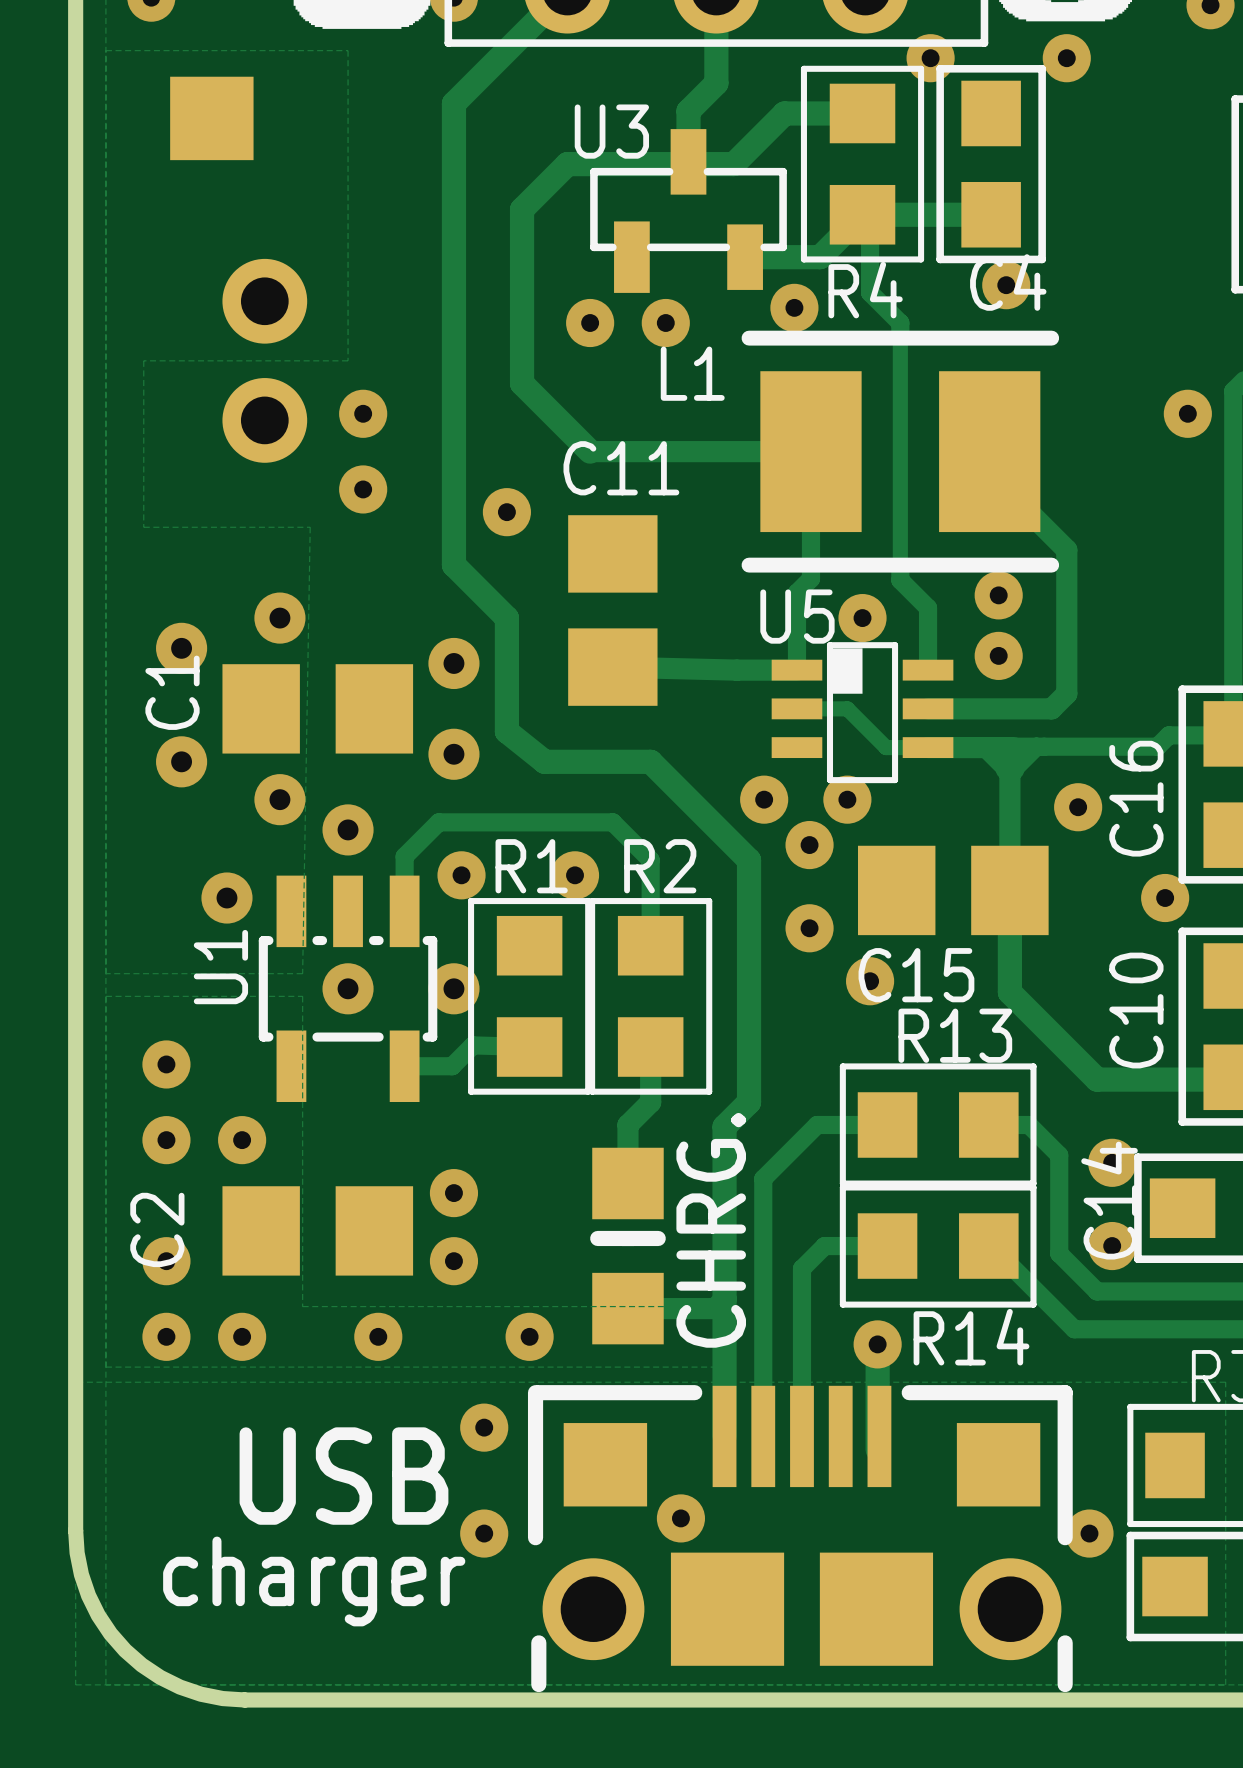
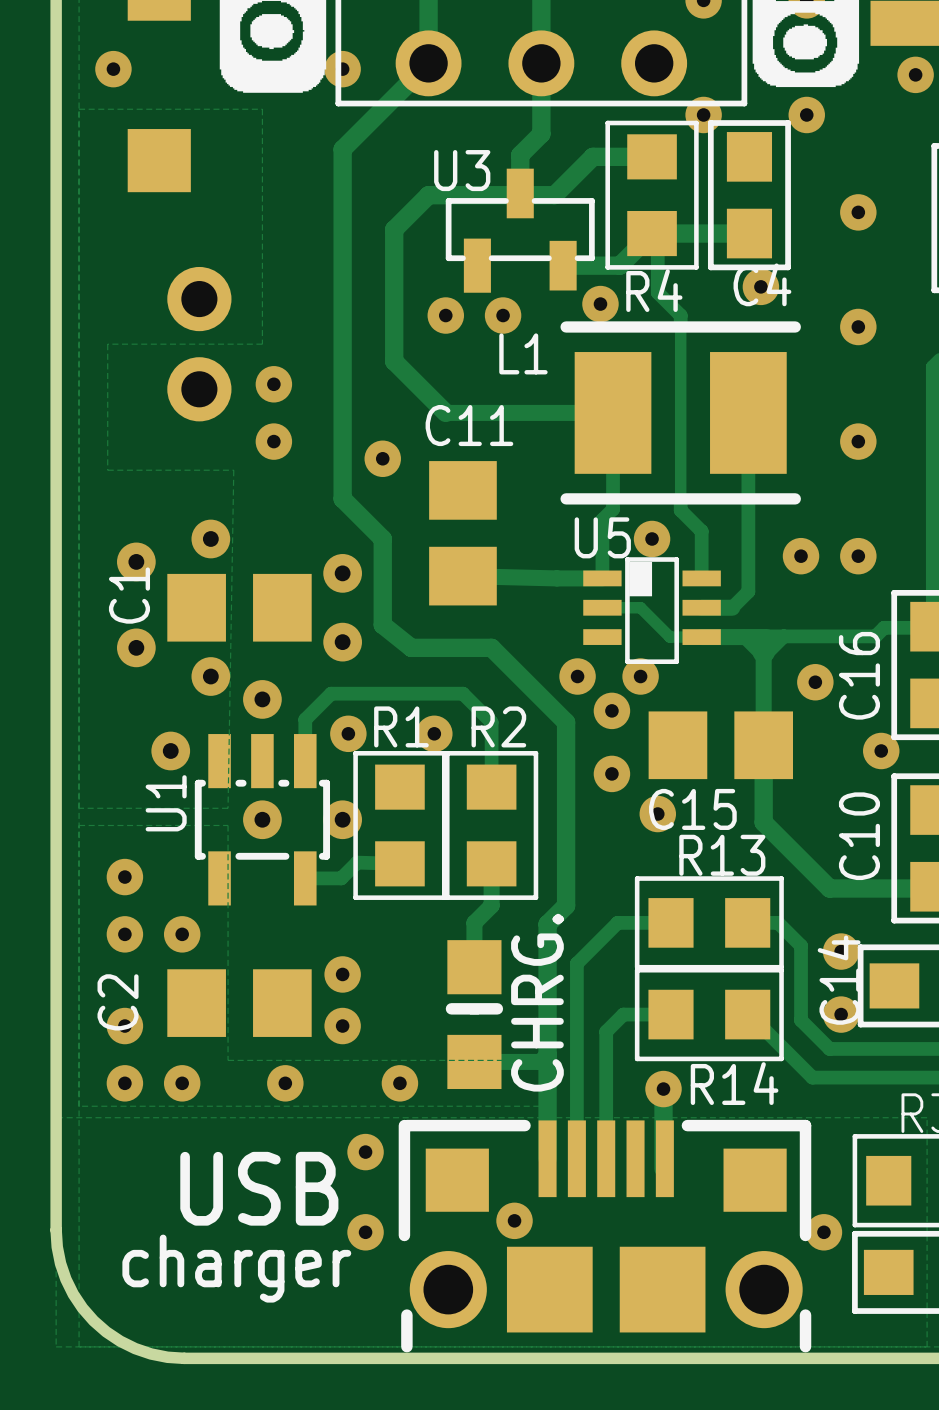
via: none -> (858, 212)
via: none -> (858, 326)
via: (1187, 413) -> none
track: (989, 451) (1028, 490) (1028, 512) (1066, 549) (1066, 693) (1051, 708) (968, 708) -> (748, 412) (748, 591) (732, 607)
via: none -> (858, 441)
via: (998, 595) -> none
via: none -> (801, 556)
via: none -> (858, 556)
via: (998, 655) -> none

